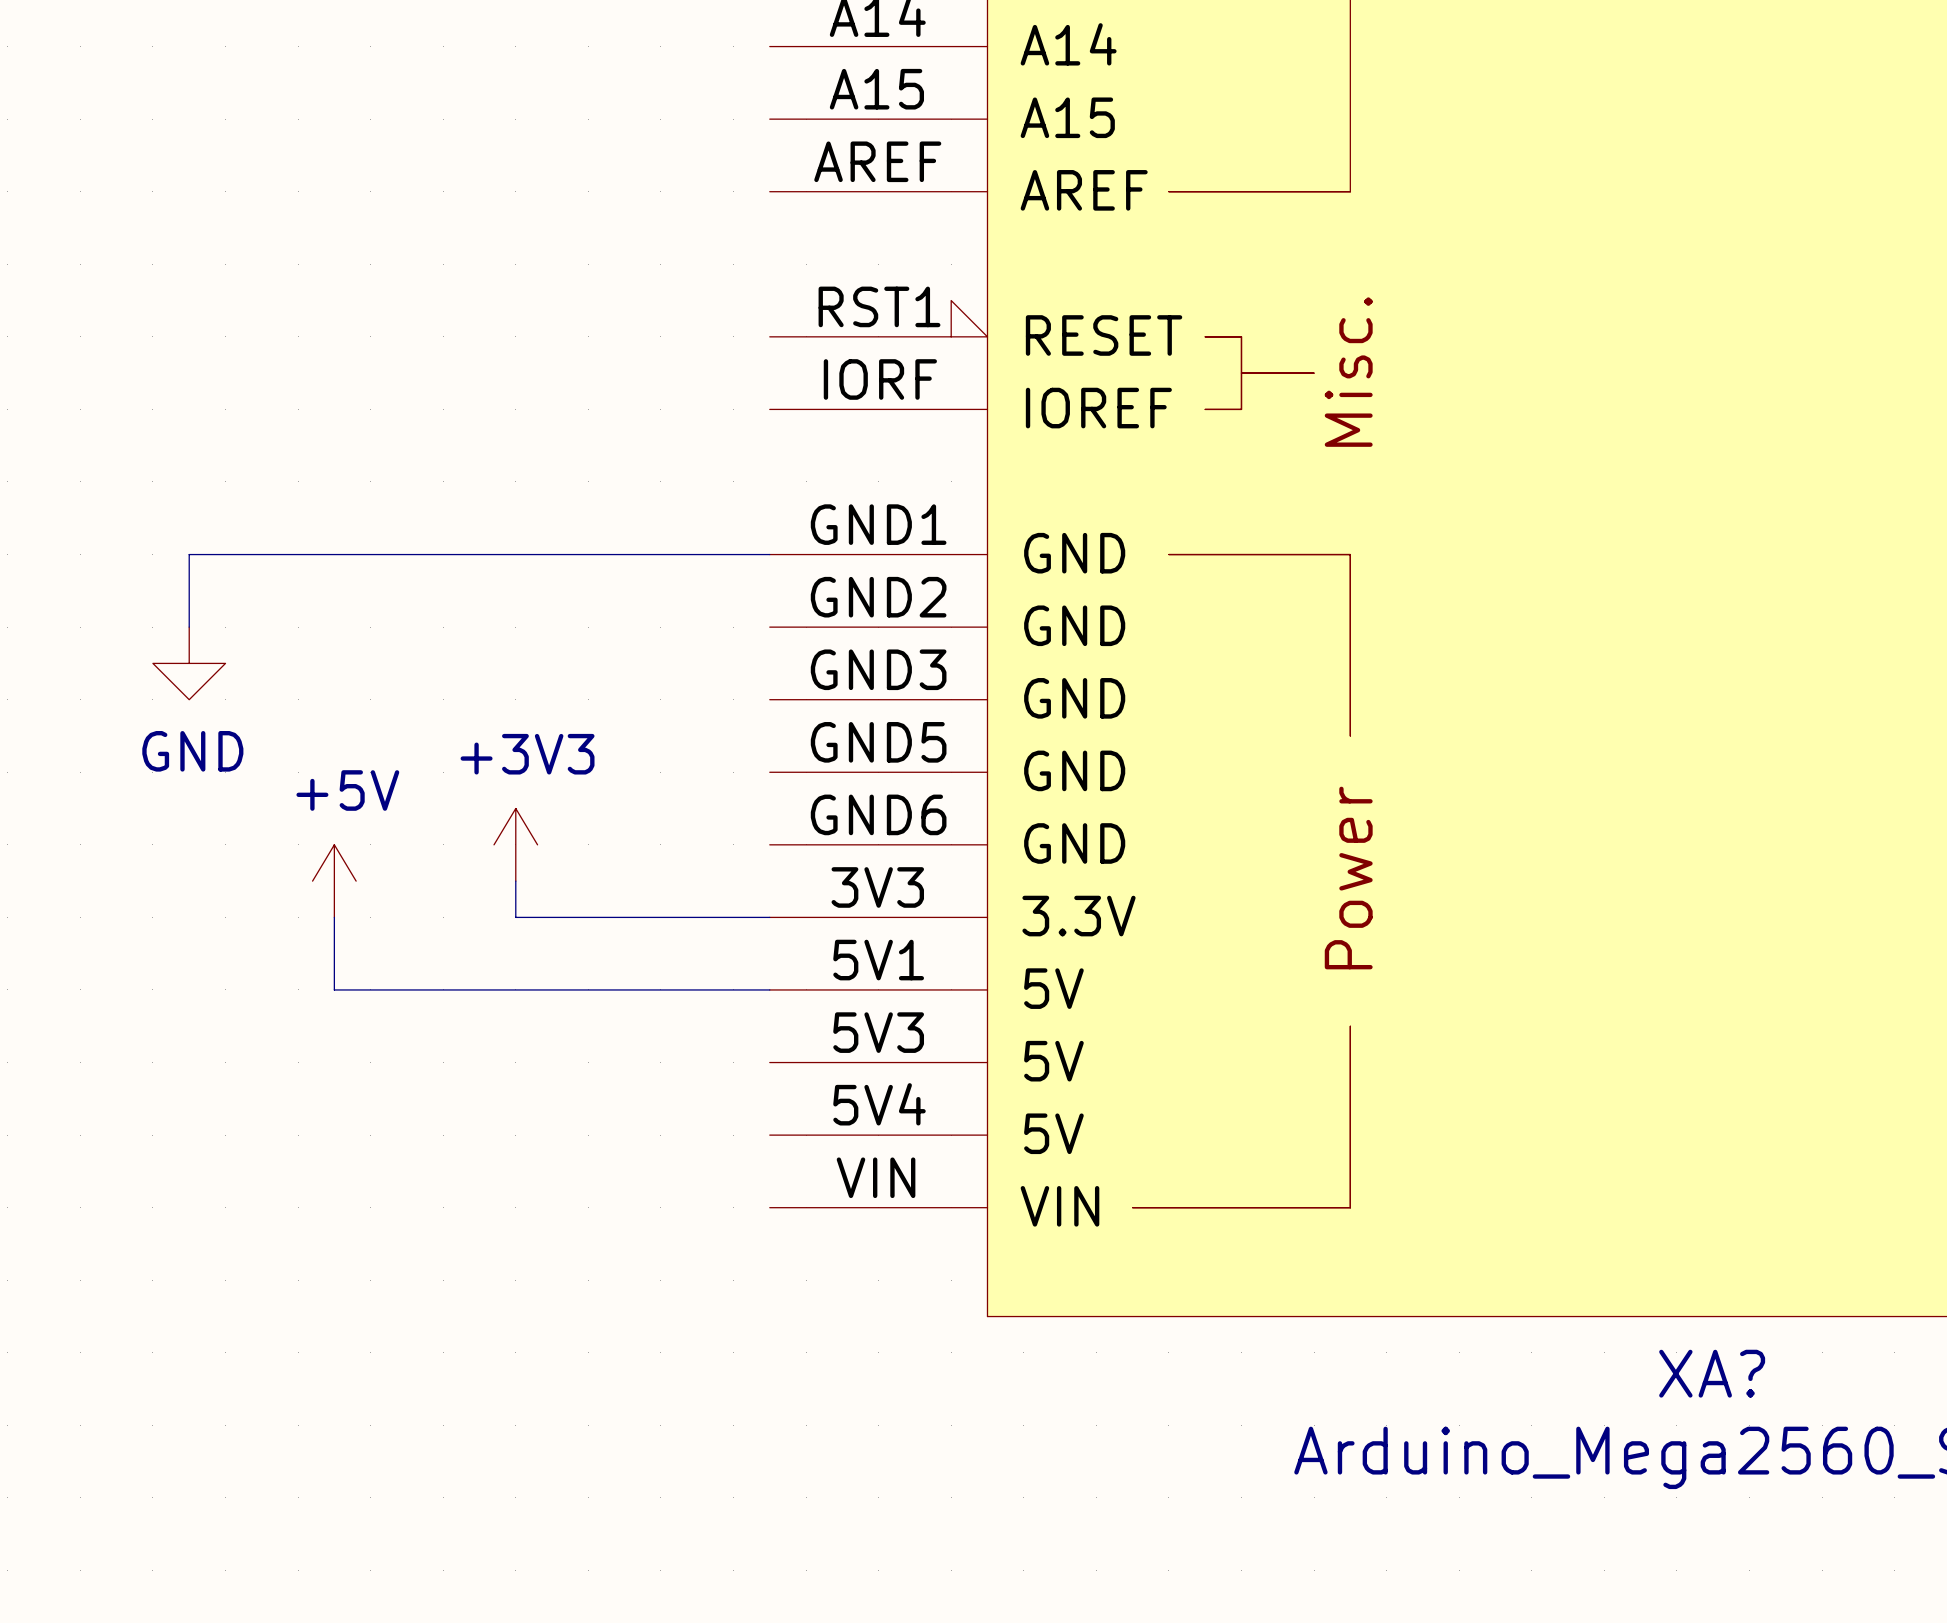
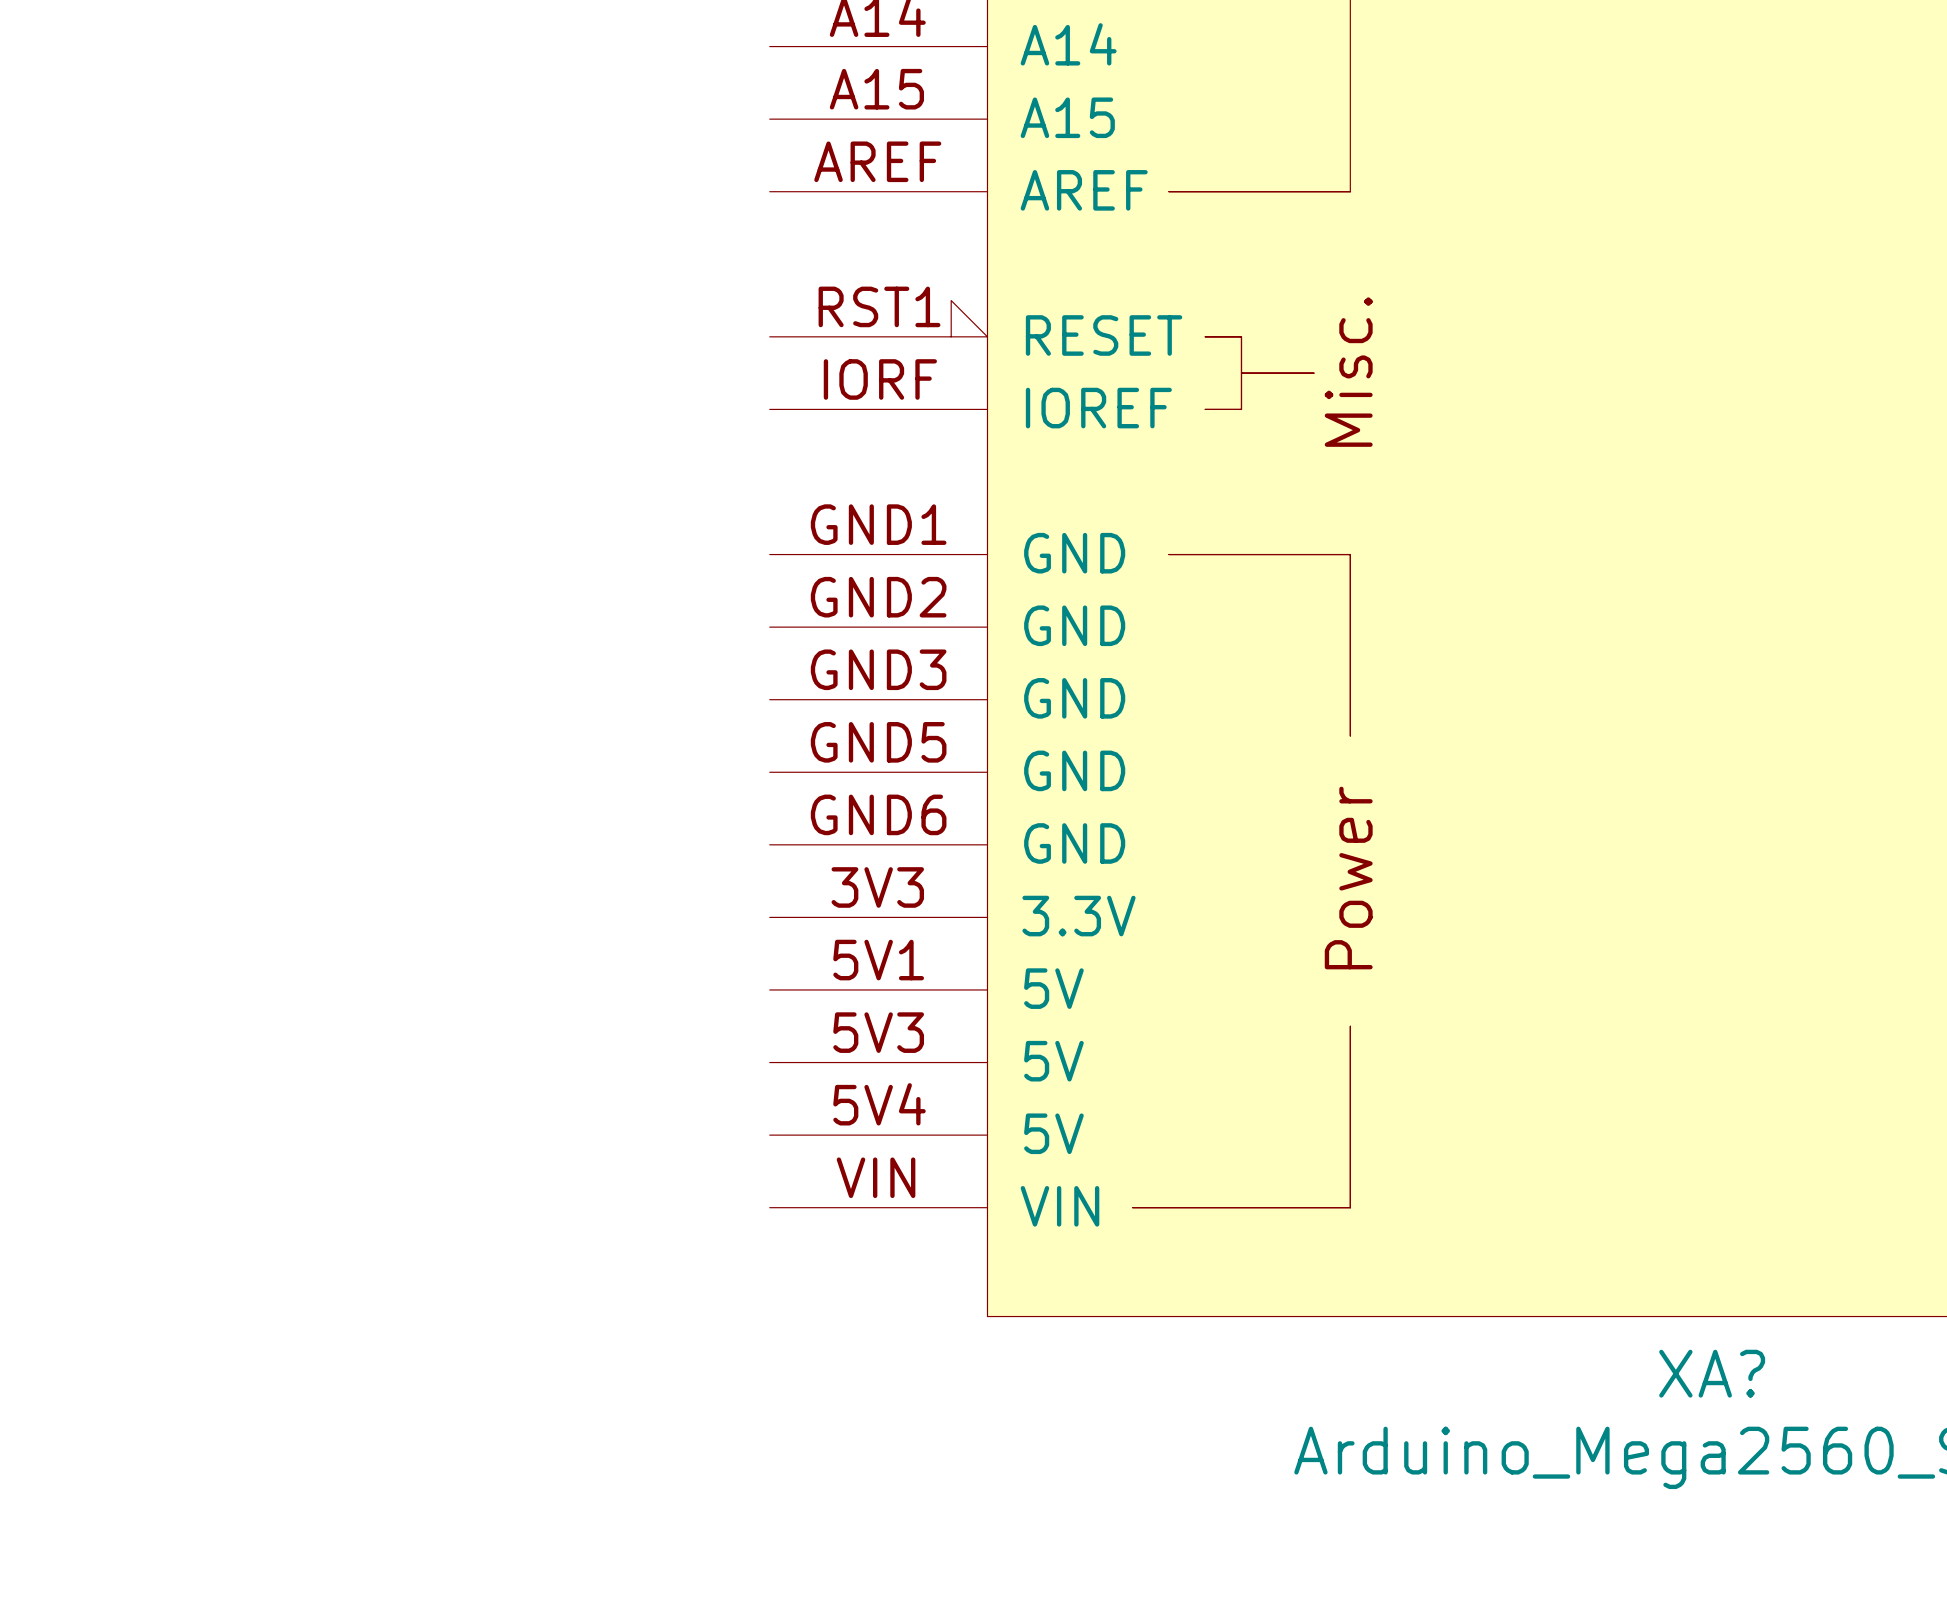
wire: (769, 554) (189, 554) (189, 627) -> none
power symbol: GND (189, 663) -> none
power symbol: +3V3 (515, 844) -> none
power symbol: +5V (334, 881) -> none
wire: (515, 881) (515, 917) (769, 917) -> none
wire: (334, 917) (334, 989) (769, 989) -> none

